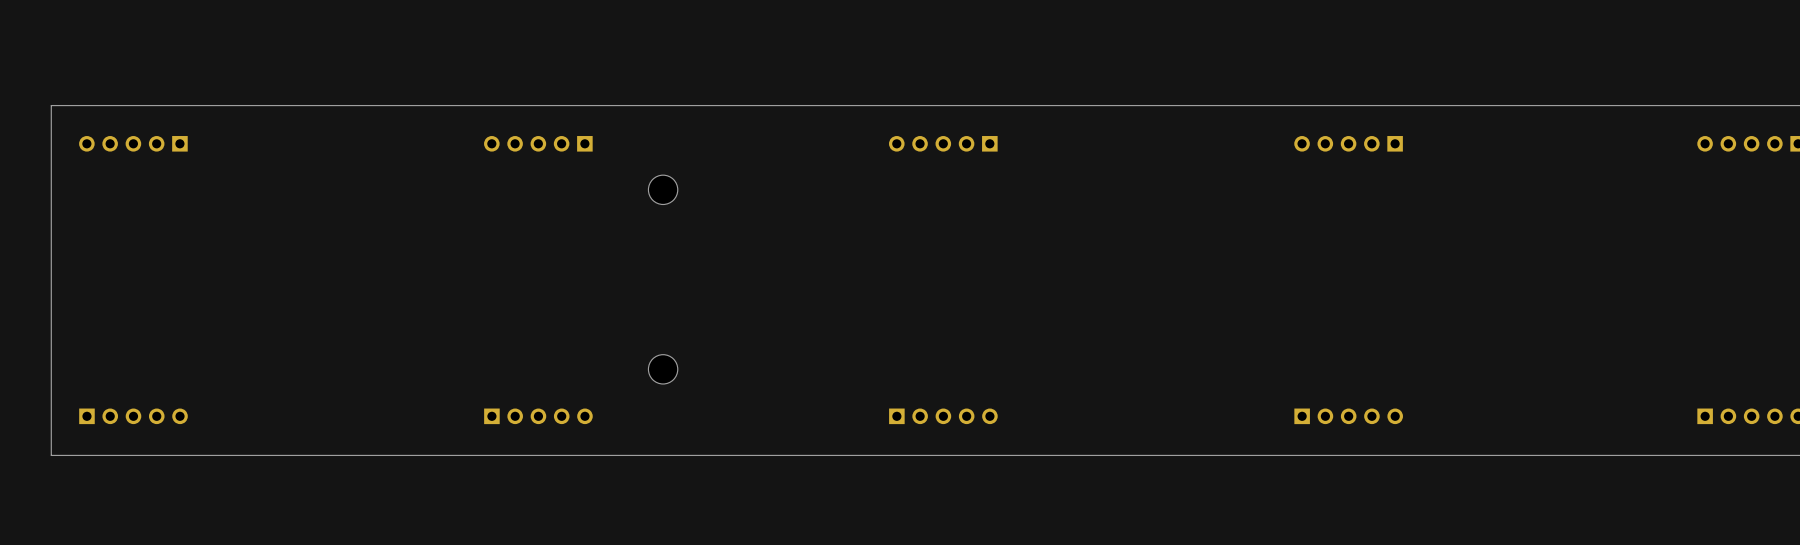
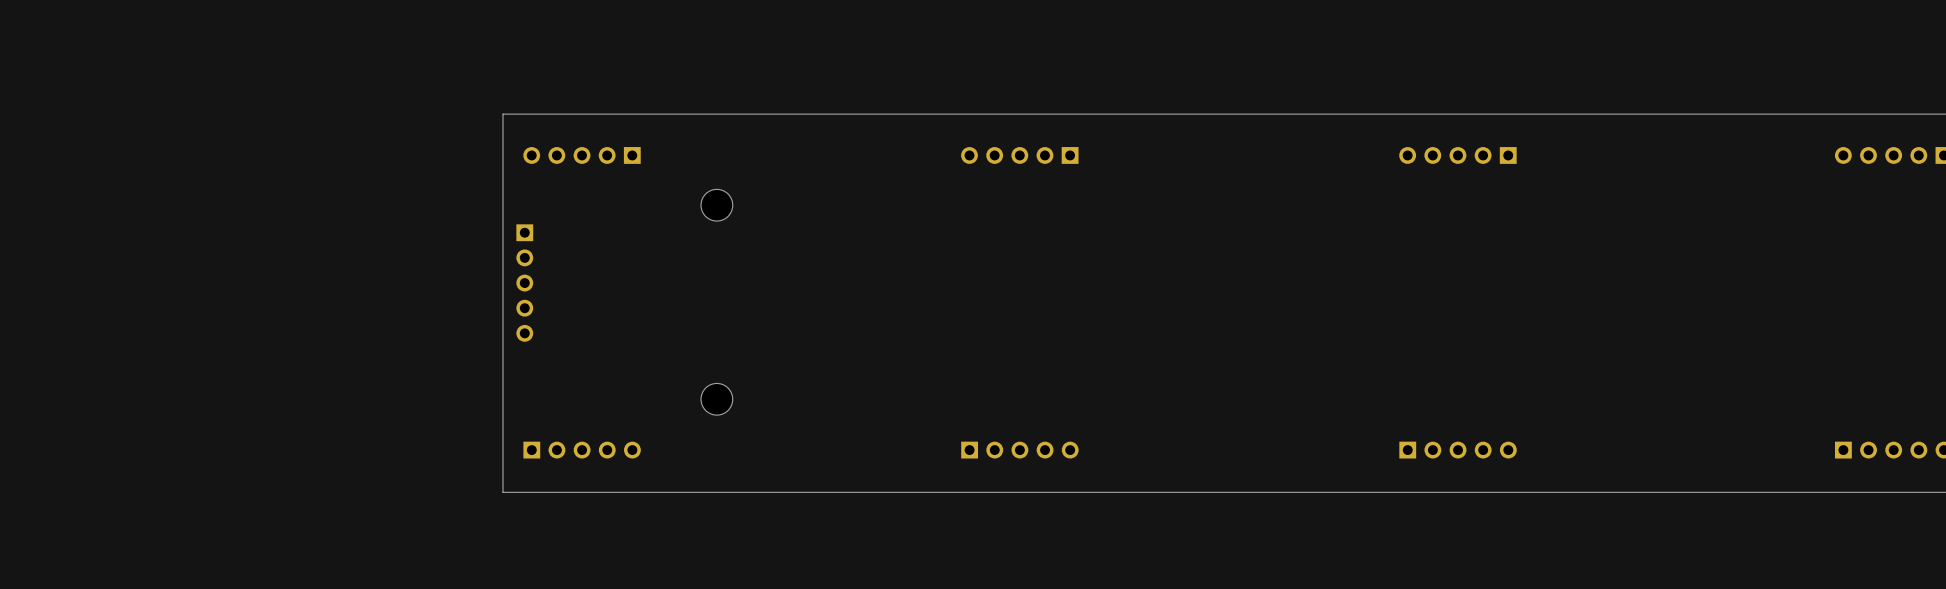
board edge: (465, 105) (51, 105) (51, 455) (465, 455) -> (503, 114) (503, 492)
part: (133, 143) -> none
part: none -> (524, 283)
part: (133, 416) -> none

